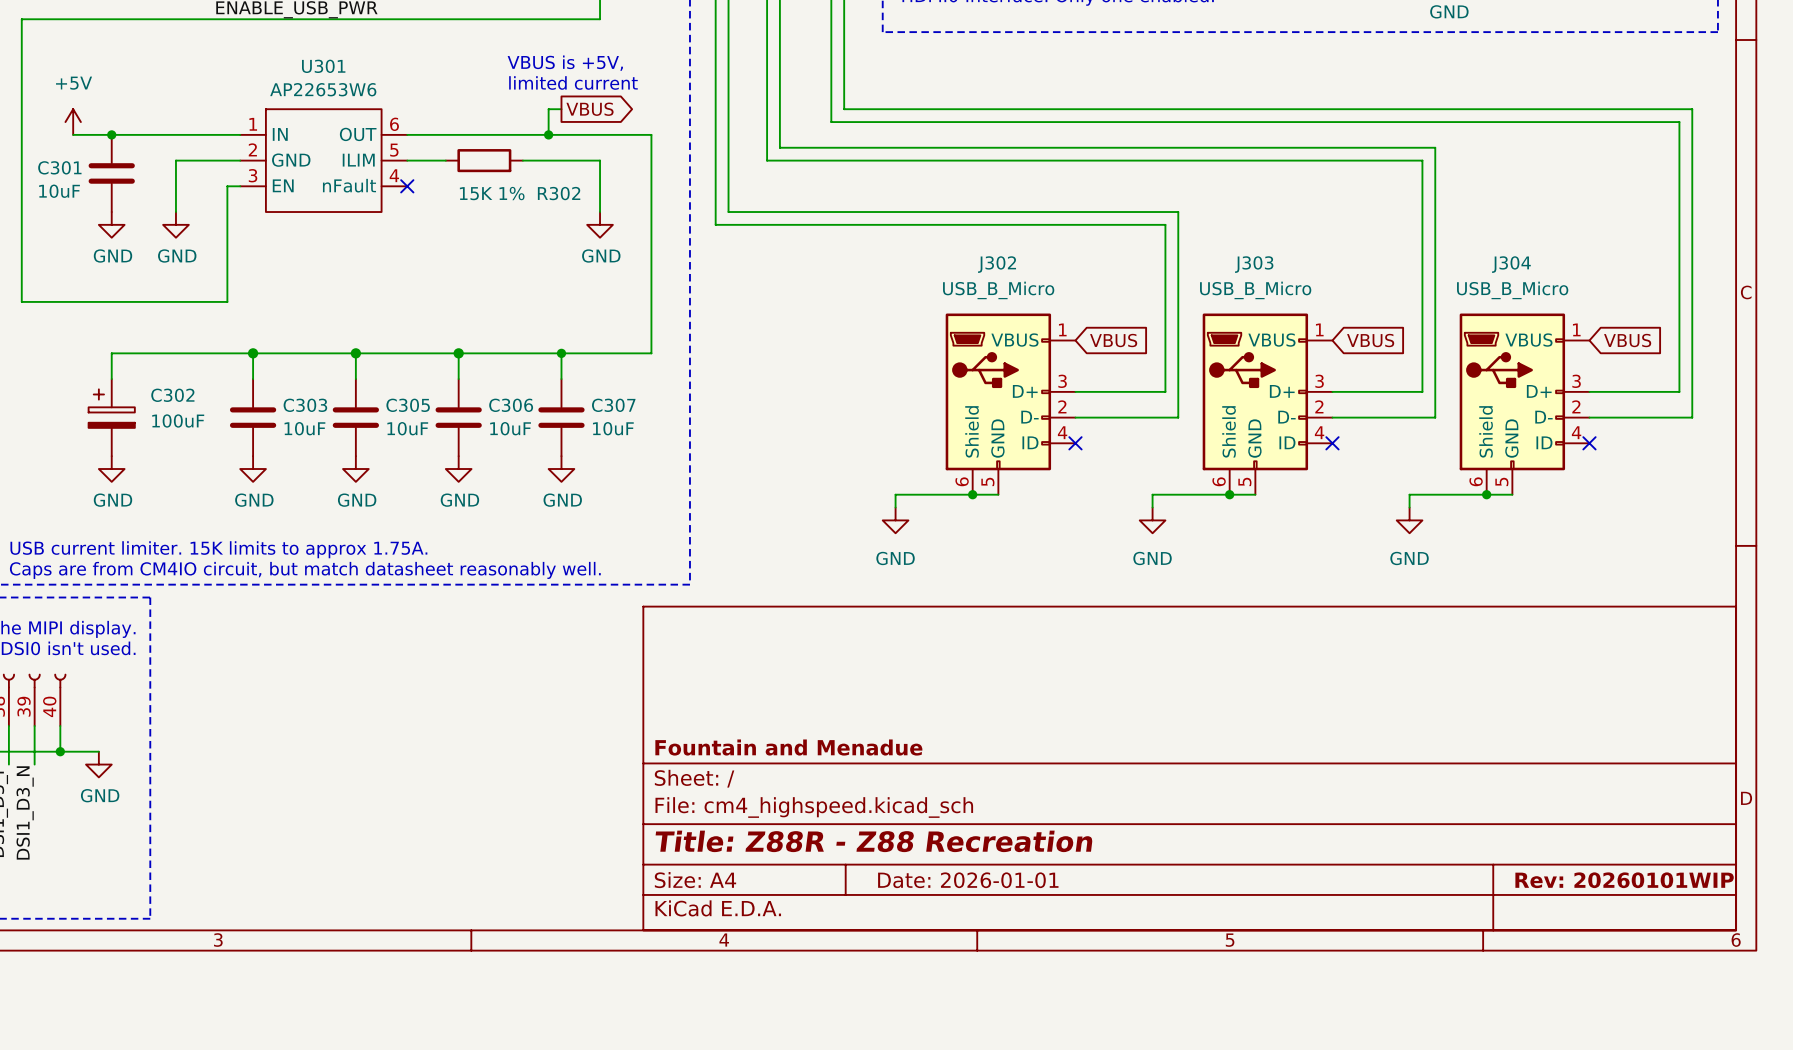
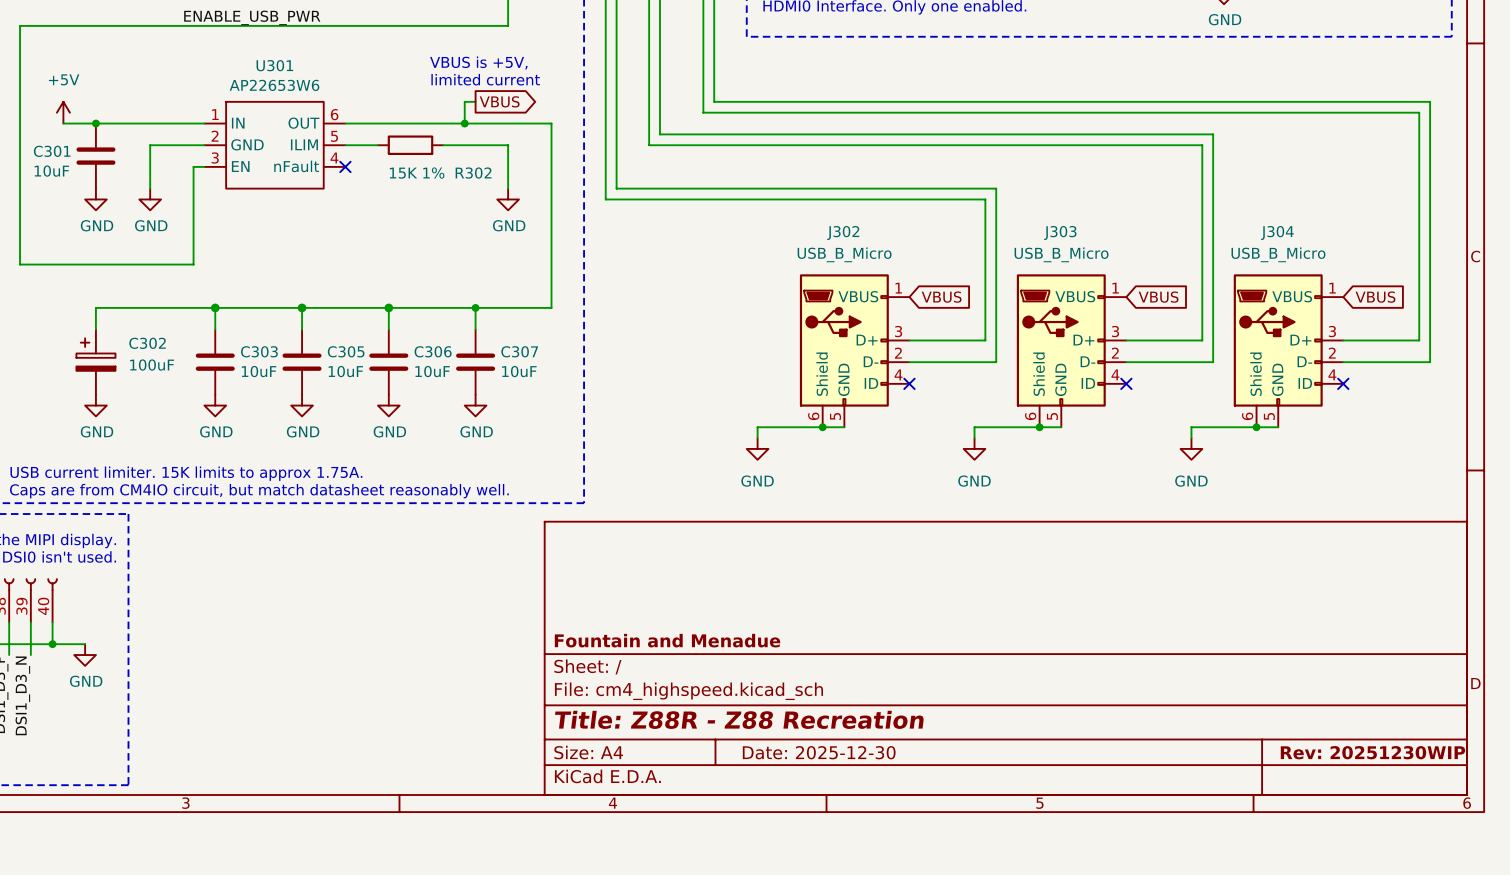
title block: Date: 2026-01-01 (968, 880) -> Date: 2025-12-30 (819, 752)
title block: Rev: 20260101WIP (1624, 880) -> Rev: 20251230WIP (1372, 752)

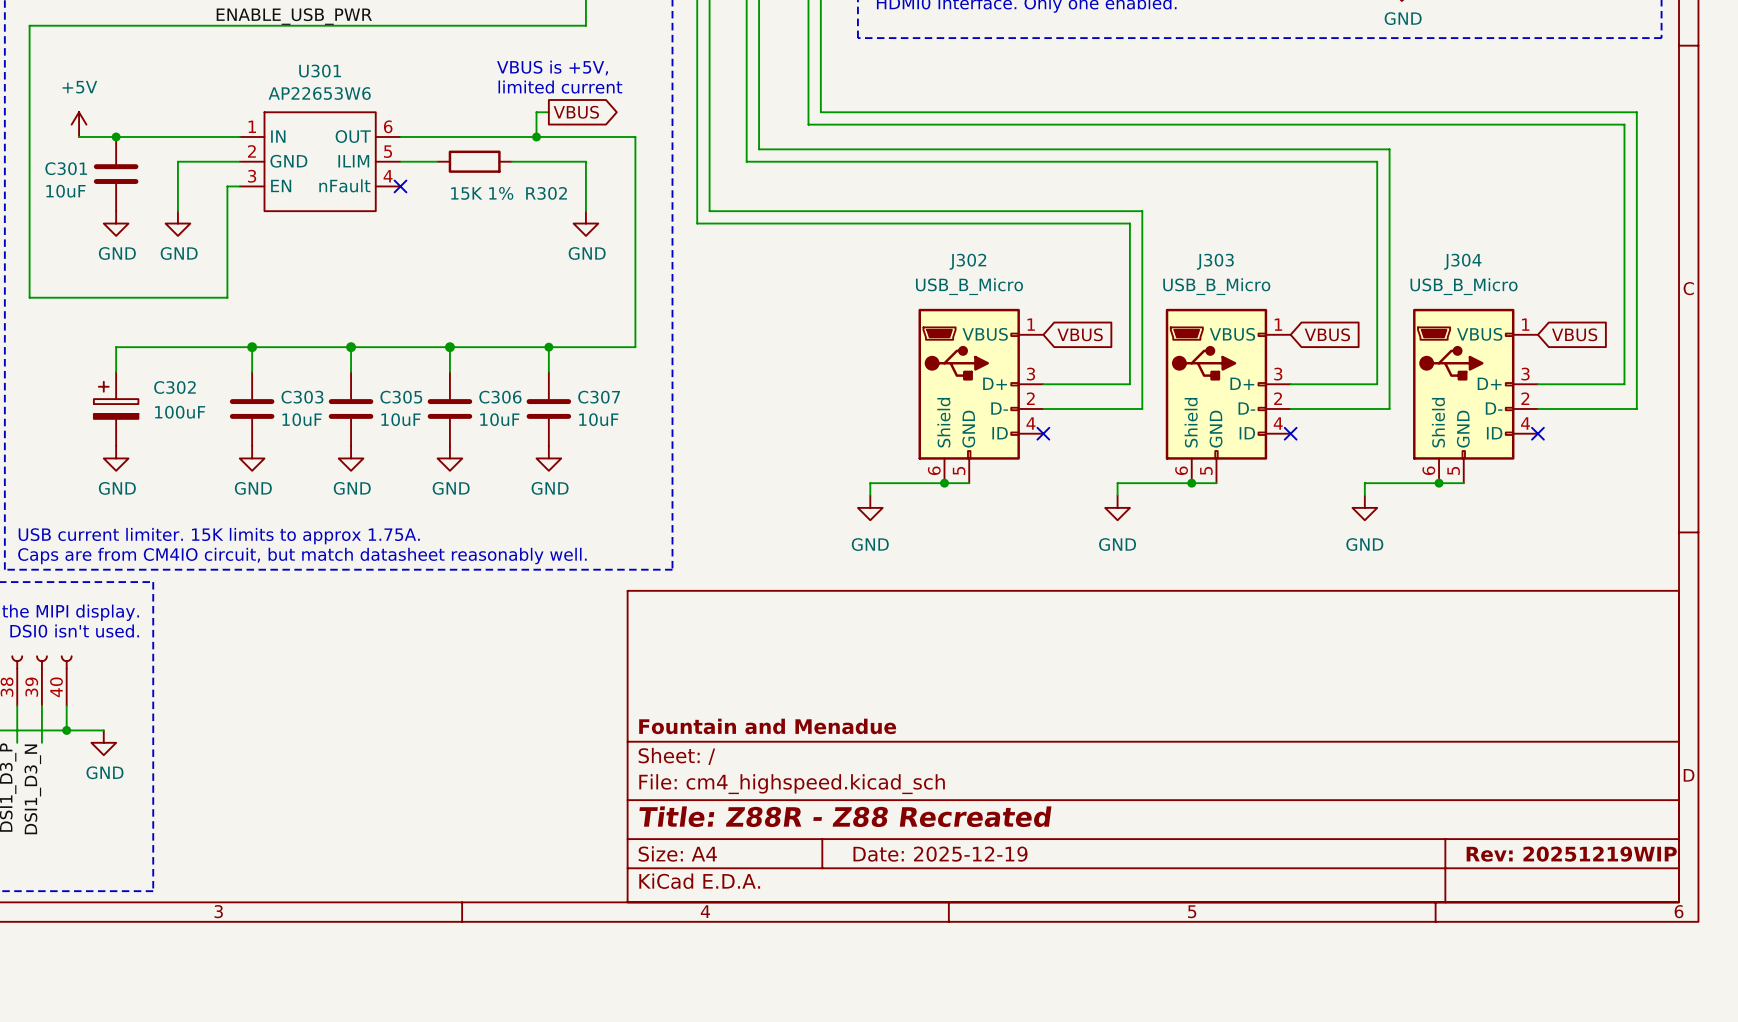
title block: Title: Z88R - Z88 Recreation (739, 719) -> Title: Z88R - Z88 Recreated (845, 816)
title block: Date: 2025-12-30 (819, 752) -> Date: 2025-12-19 (940, 854)
title block: Rev: 20251230WIP (1372, 752) -> Rev: 20251219WIP (1571, 854)

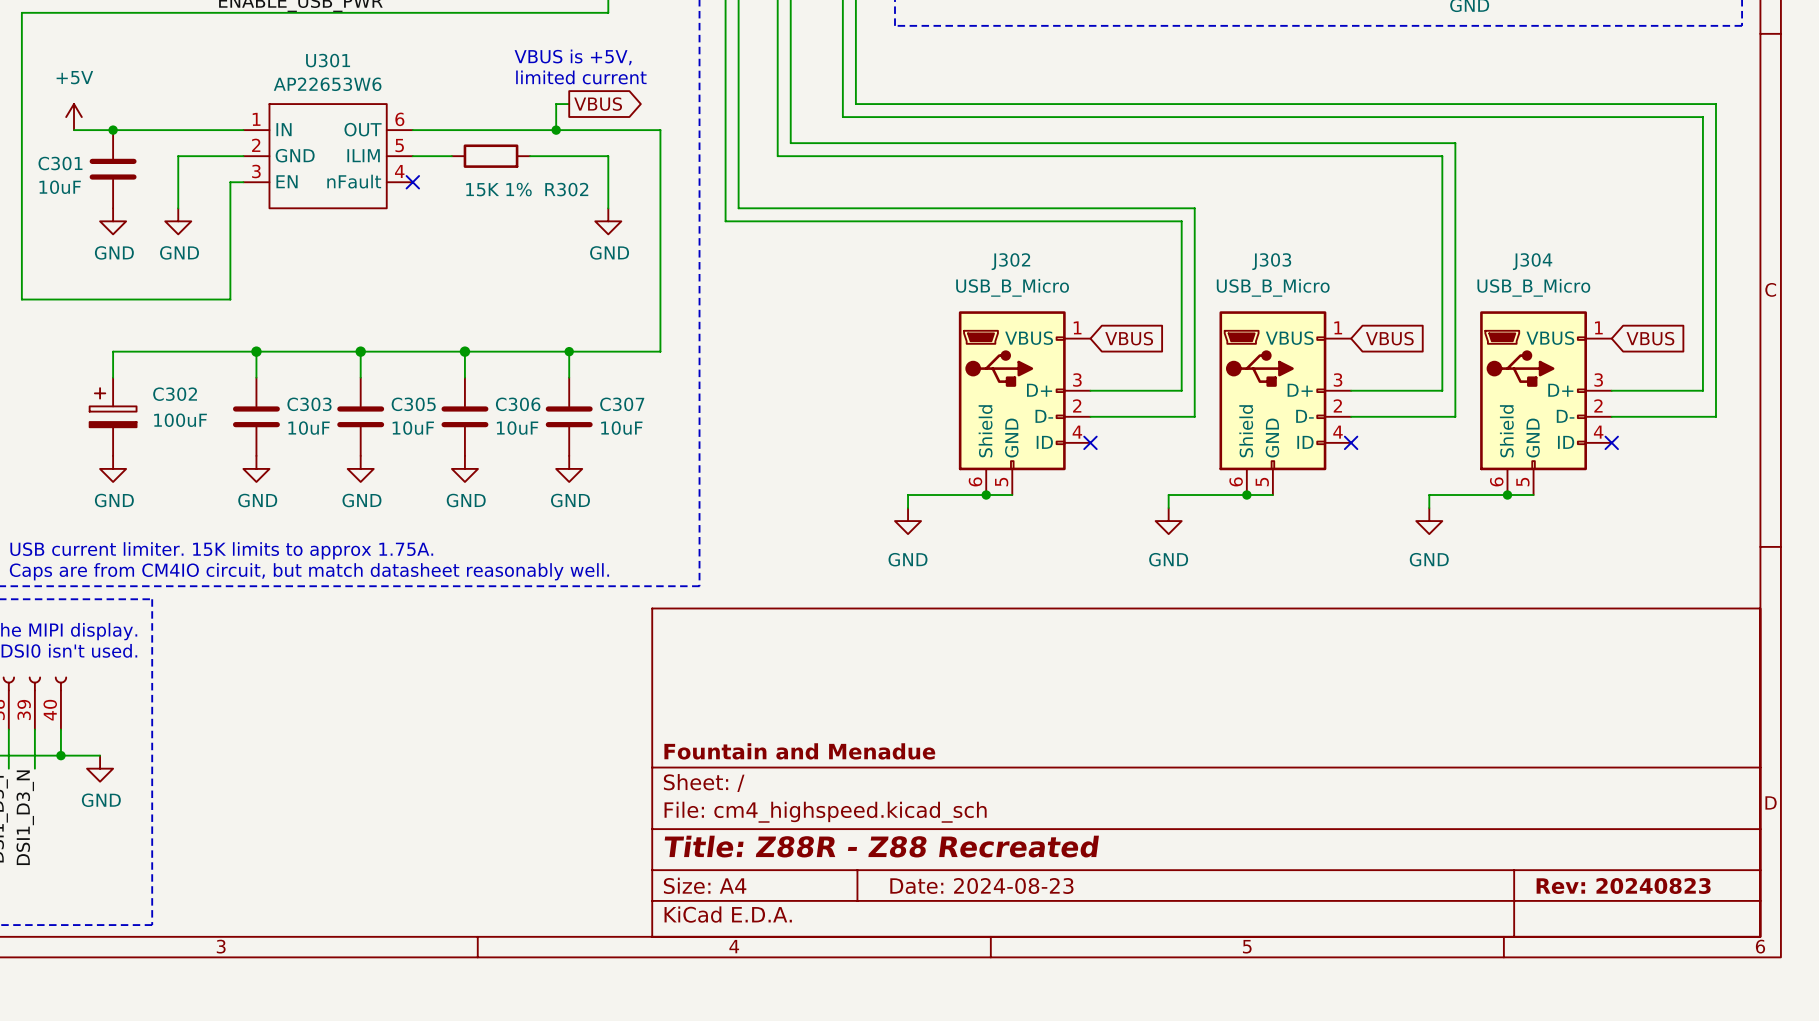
title block: Date: 2025-12-19 (940, 854) -> Date: 2024-08-23 (981, 886)
title block: Rev: 20251219WIP (1571, 854) -> Rev: 20240823 (1623, 886)

